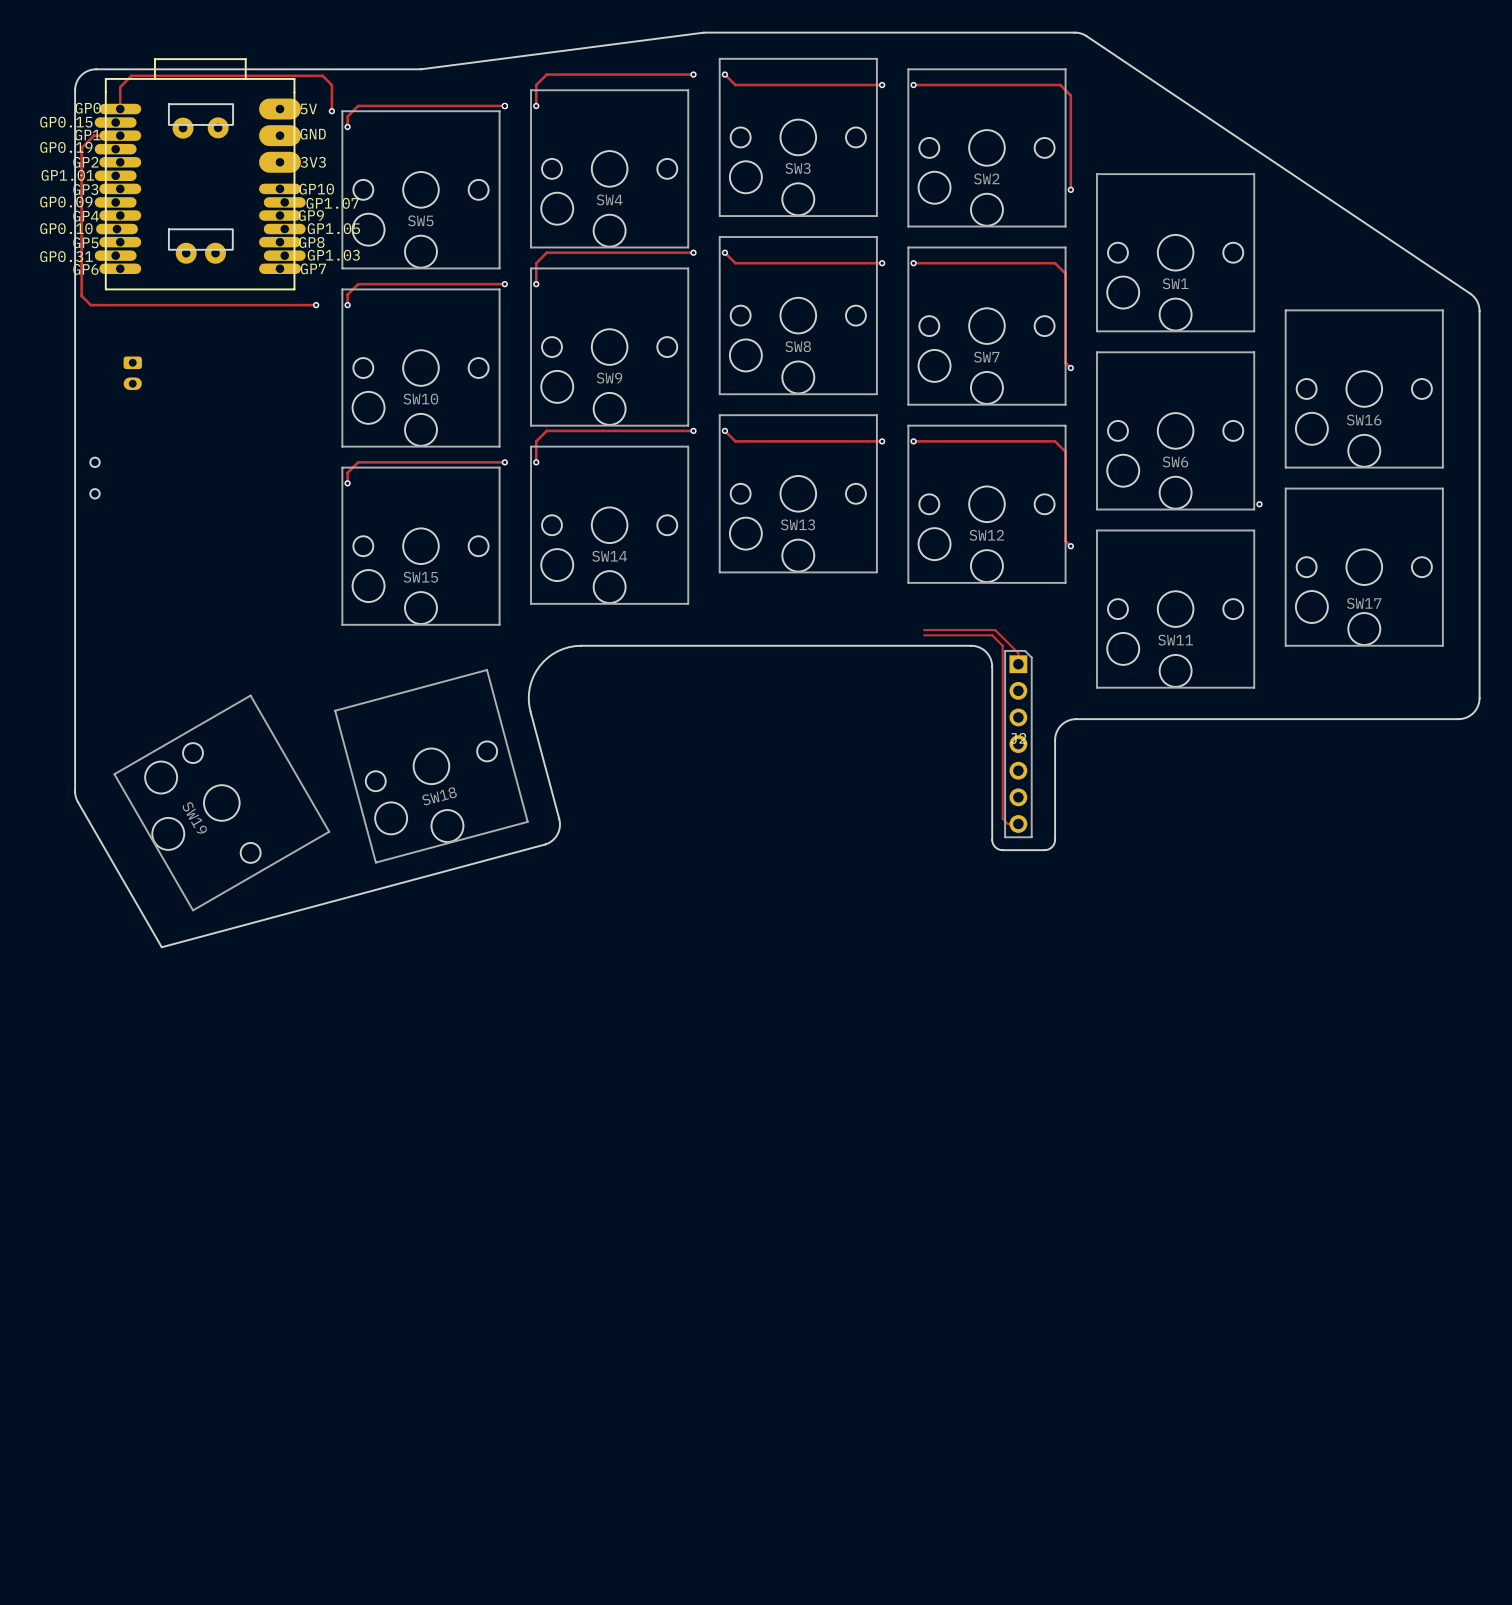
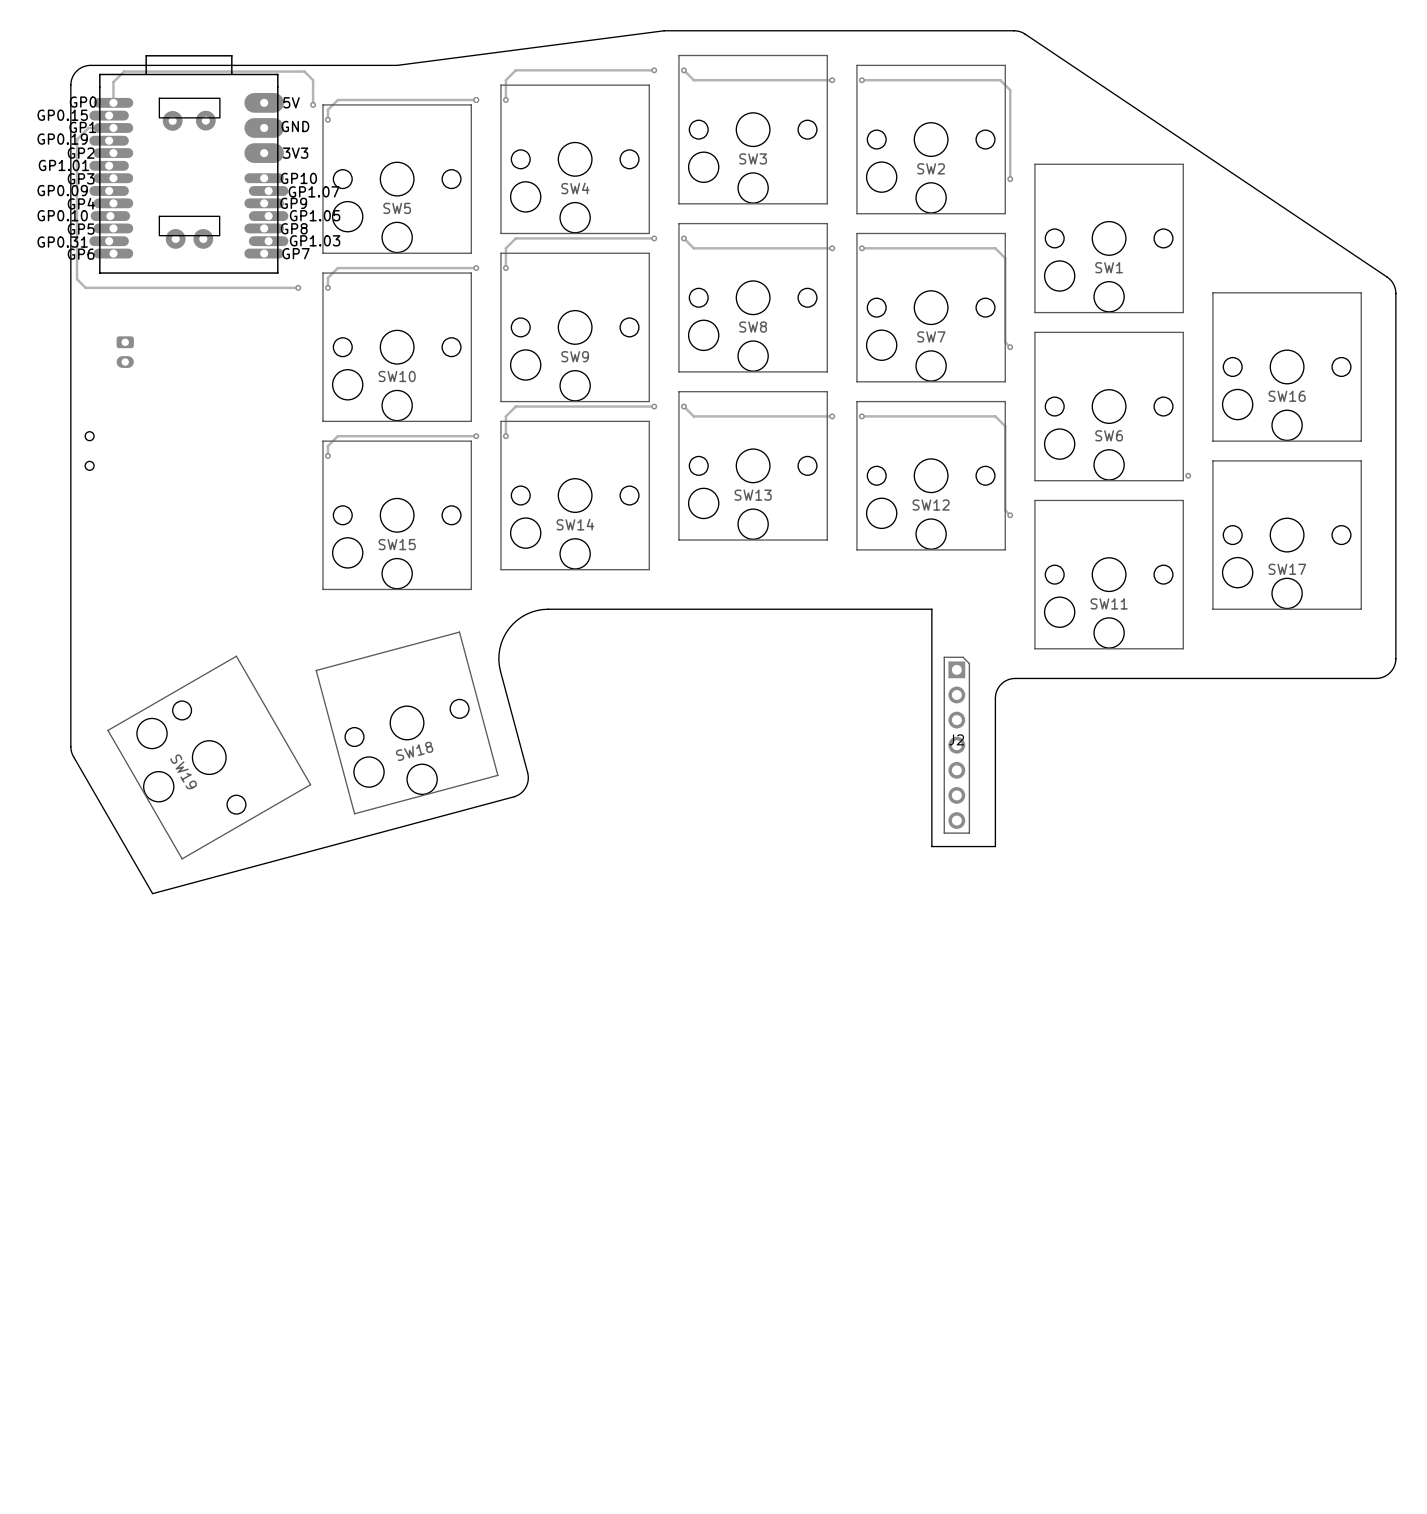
track: (924, 630) (995, 630) (1018, 653) (1018, 664) -> none
track: (924, 635) (992, 635) (1002, 645) (1002, 818) (1007, 823) (1018, 823) -> none
board edge: (971, 645) (978, 646) (986, 651) (992, 664) (993, 844) (1001, 850) (1045, 850) (1052, 847) (1055, 839) -> (916, 609) (931, 609) (931, 846) (995, 846) (995, 792)
J2 position: (1018, 744) -> (956, 745)

